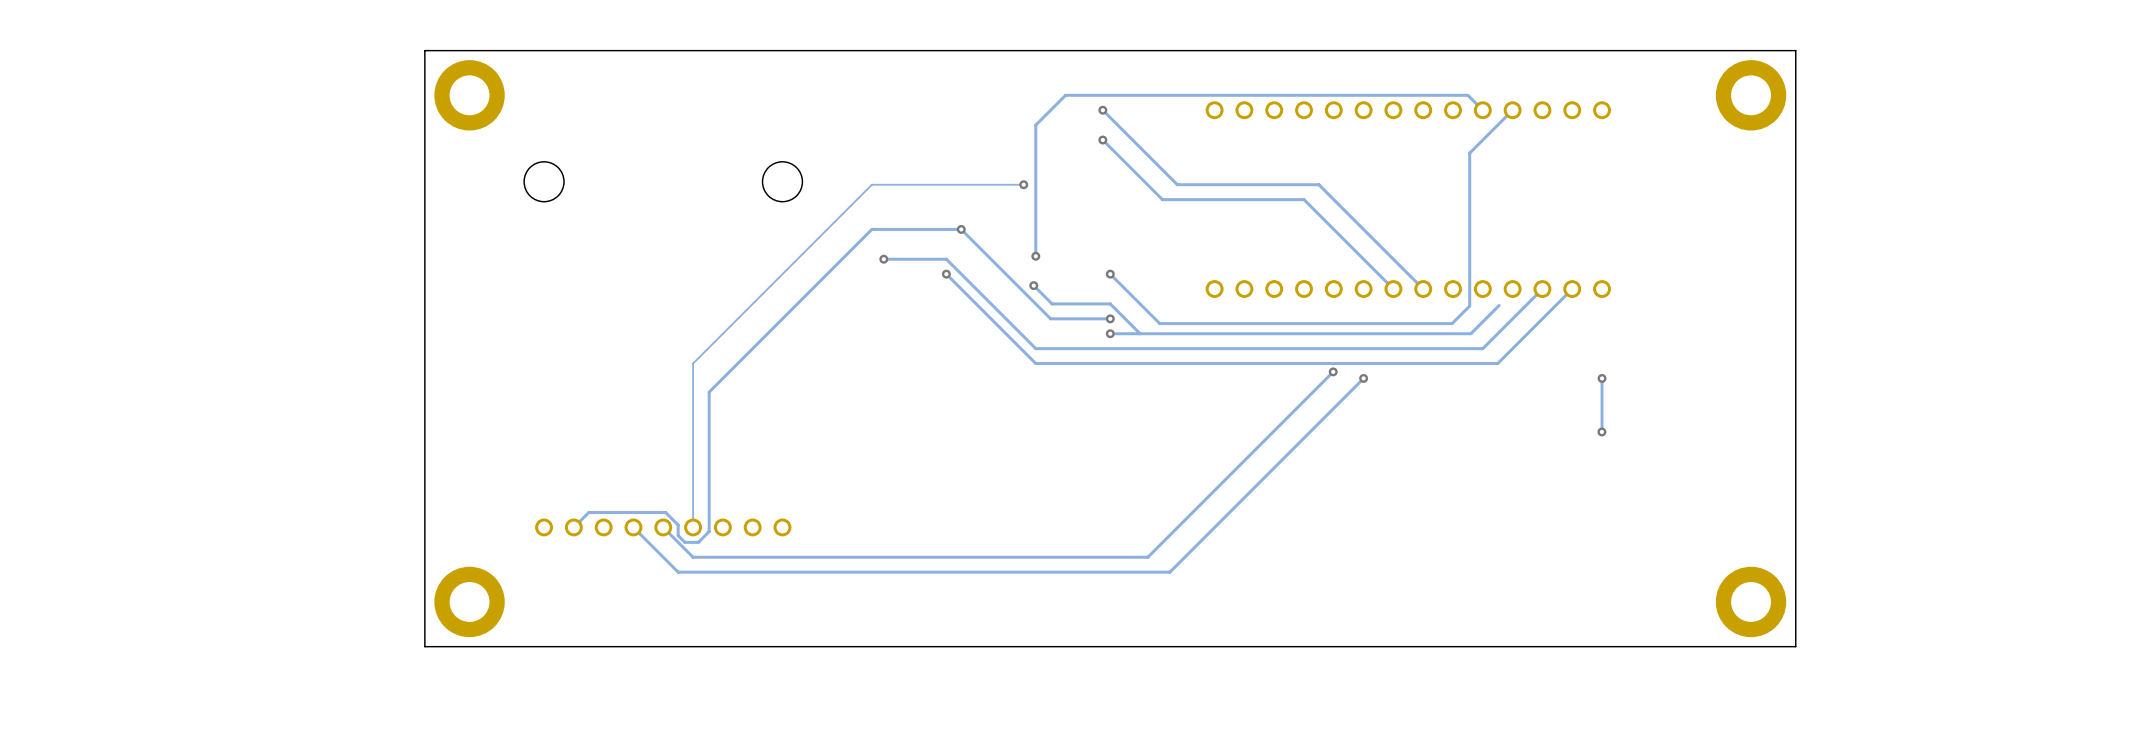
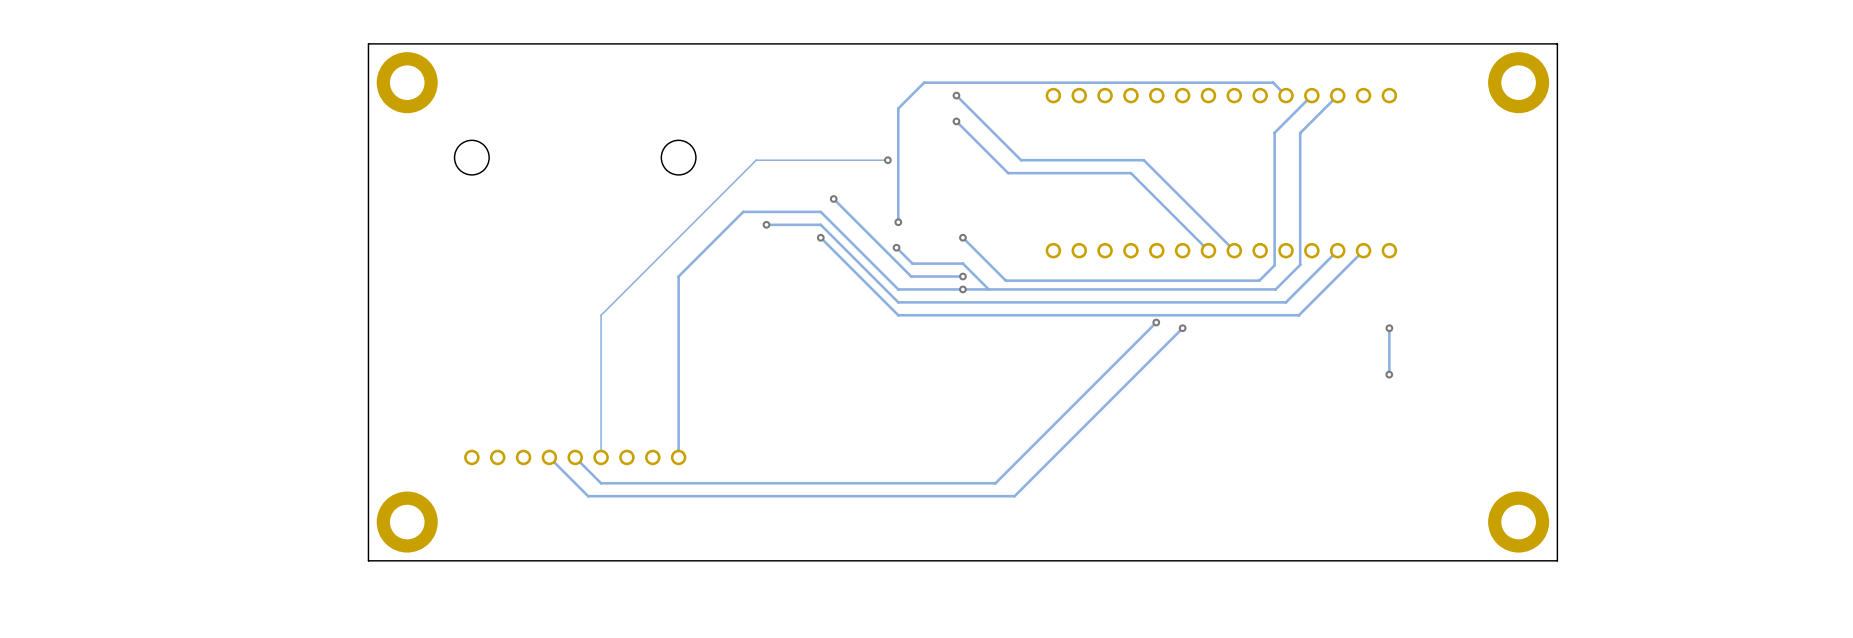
track: none -> (1337, 95) (1300, 133) (1300, 264)
track: (961, 229) (871, 229) (856, 244) -> (962, 289) (898, 289) (820, 211) (743, 211)
track: (782, 318) (709, 392) (709, 531) (698, 542) (684, 542) (678, 535) (678, 525) (665, 512) (588, 512) (573, 527) -> (678, 276) (678, 457)

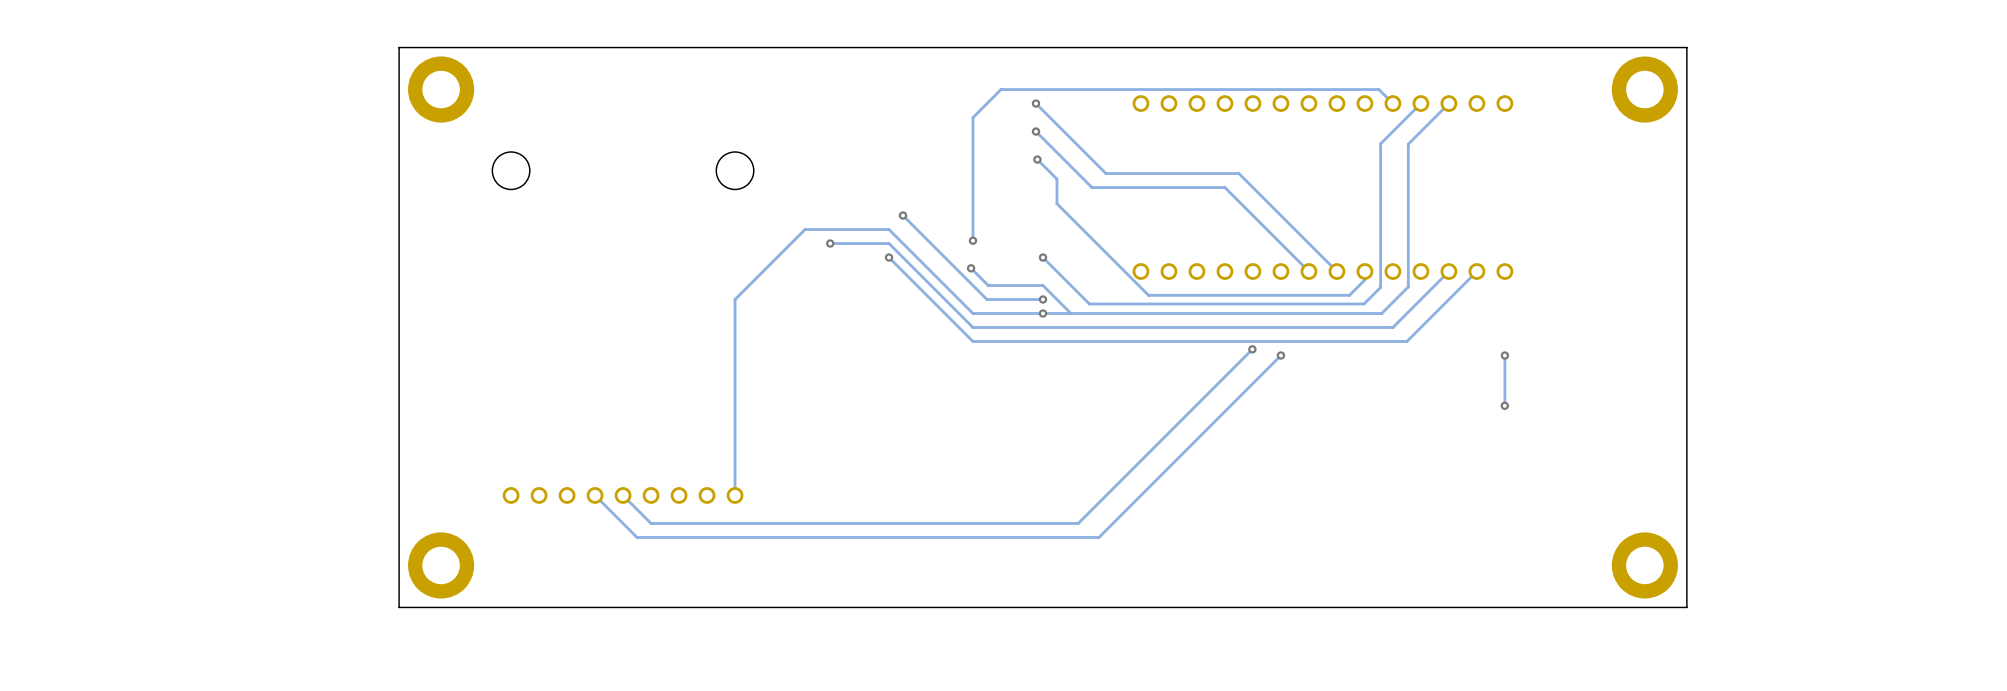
track: none -> (1037, 159) (1056, 179) (1056, 203) (1148, 295) (1349, 295) (1364, 279) (1364, 271)
via: none -> (1037, 159)
track: (887, 160) (756, 160) (601, 315) (601, 457) -> none
via: (887, 160) -> none

